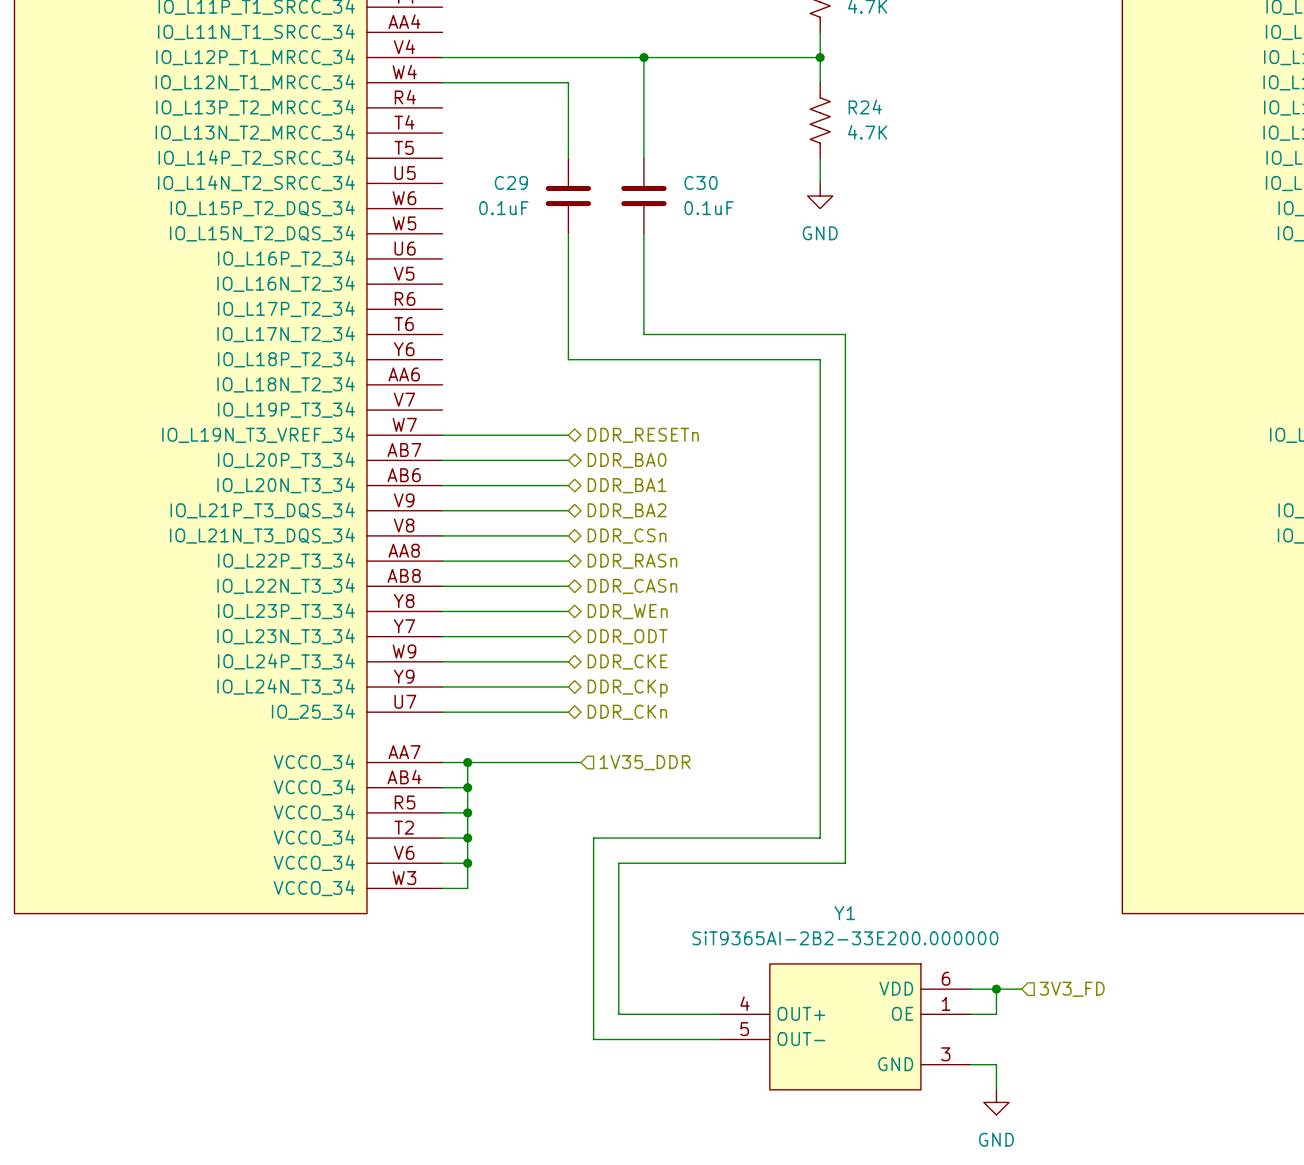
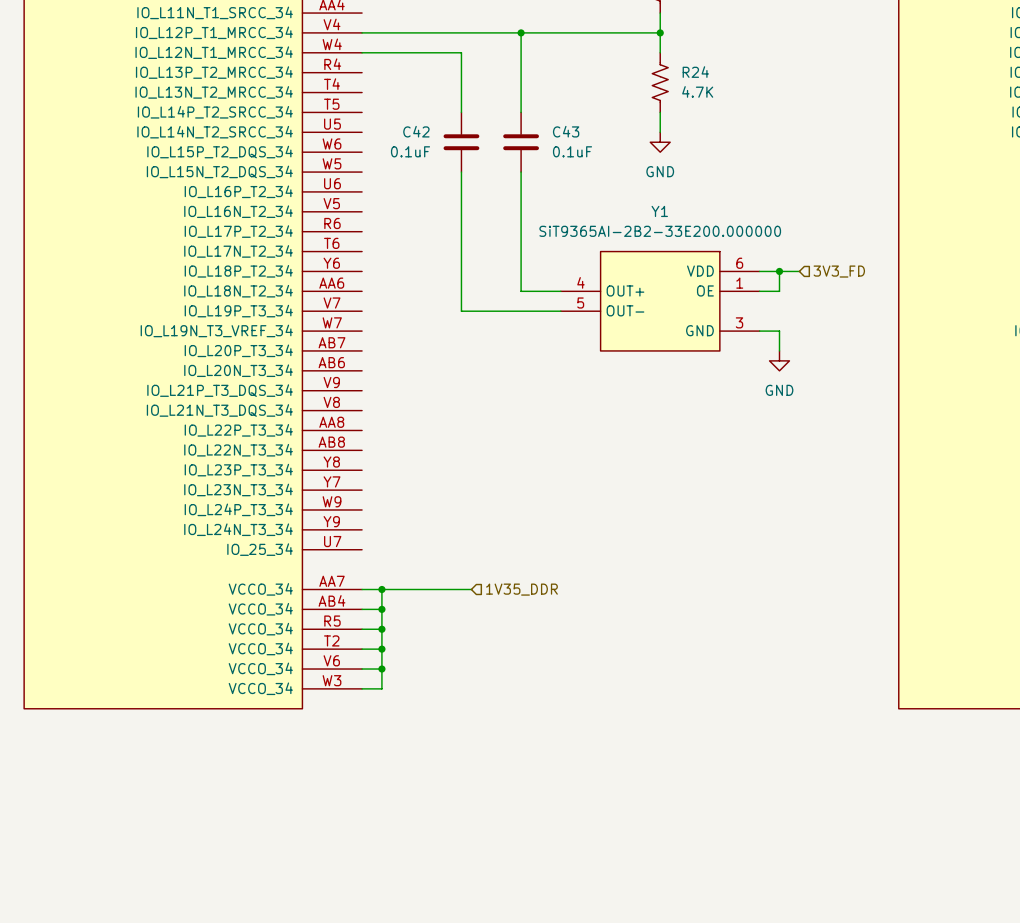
C29 name: C29 (511, 182) -> C42 (416, 131)
C30 name: C30 (700, 182) -> C43 (566, 131)
wire: (643, 334) (845, 334) (845, 863) (618, 863) (618, 1014) (719, 1014) -> (521, 251) (521, 291) (560, 291)
wire: (568, 359) (820, 359) (820, 838) (593, 838) (593, 1039) (719, 1039) -> (461, 271) (461, 311) (560, 311)
wire: none -> (759, 271) (799, 271)
wire: none -> (779, 271) (779, 291) (759, 291)
junction: none -> (779, 271)
hierarchical label: none -> 3V3_FD (839, 271)
wire: (442, 435) (568, 435) -> none
hierarchical label: DDR_RESETn (643, 435) -> none
wire: none -> (759, 331) (779, 331) (779, 350)
wire: (442, 460) (568, 460) -> none
hierarchical label: DDR_BA0 (627, 460) -> none
power symbol: none -> GND (779, 360)
wire: (442, 485) (568, 485) -> none
hierarchical label: DDR_BA1 (627, 485) -> none
wire: (442, 510) (568, 510) -> none
hierarchical label: DDR_BA2 (627, 510) -> none
wire: (442, 535) (568, 535) -> none
hierarchical label: DDR_CSn (627, 536) -> none
wire: (442, 561) (568, 561) -> none
hierarchical label: DDR_RASn (632, 561) -> none
wire: (442, 586) (568, 586) -> none
hierarchical label: DDR_CASn (632, 586) -> none
wire: (442, 611) (568, 611) -> none
hierarchical label: DDR_WEn (627, 611) -> none
wire: (442, 636) (568, 636) -> none
hierarchical label: DDR_ODT (627, 636) -> none
wire: (442, 661) (568, 661) -> none
hierarchical label: DDR_CKE (627, 661) -> none
wire: (442, 686) (568, 686) -> none
hierarchical label: DDR_CKp (627, 688) -> none
wire: (442, 712) (568, 712) -> none
hierarchical label: DDR_CKn (627, 712) -> none
wire: (971, 989) (1021, 989) -> none
wire: (996, 989) (996, 1014) (971, 1014) -> none
junction: (996, 989) -> none
hierarchical label: 3V3_FD (1072, 989) -> none
Y1 position: (845, 1026) -> (660, 301)
wire: (971, 1064) (996, 1064) (996, 1089) -> none
power symbol: GND (996, 1102) -> none

